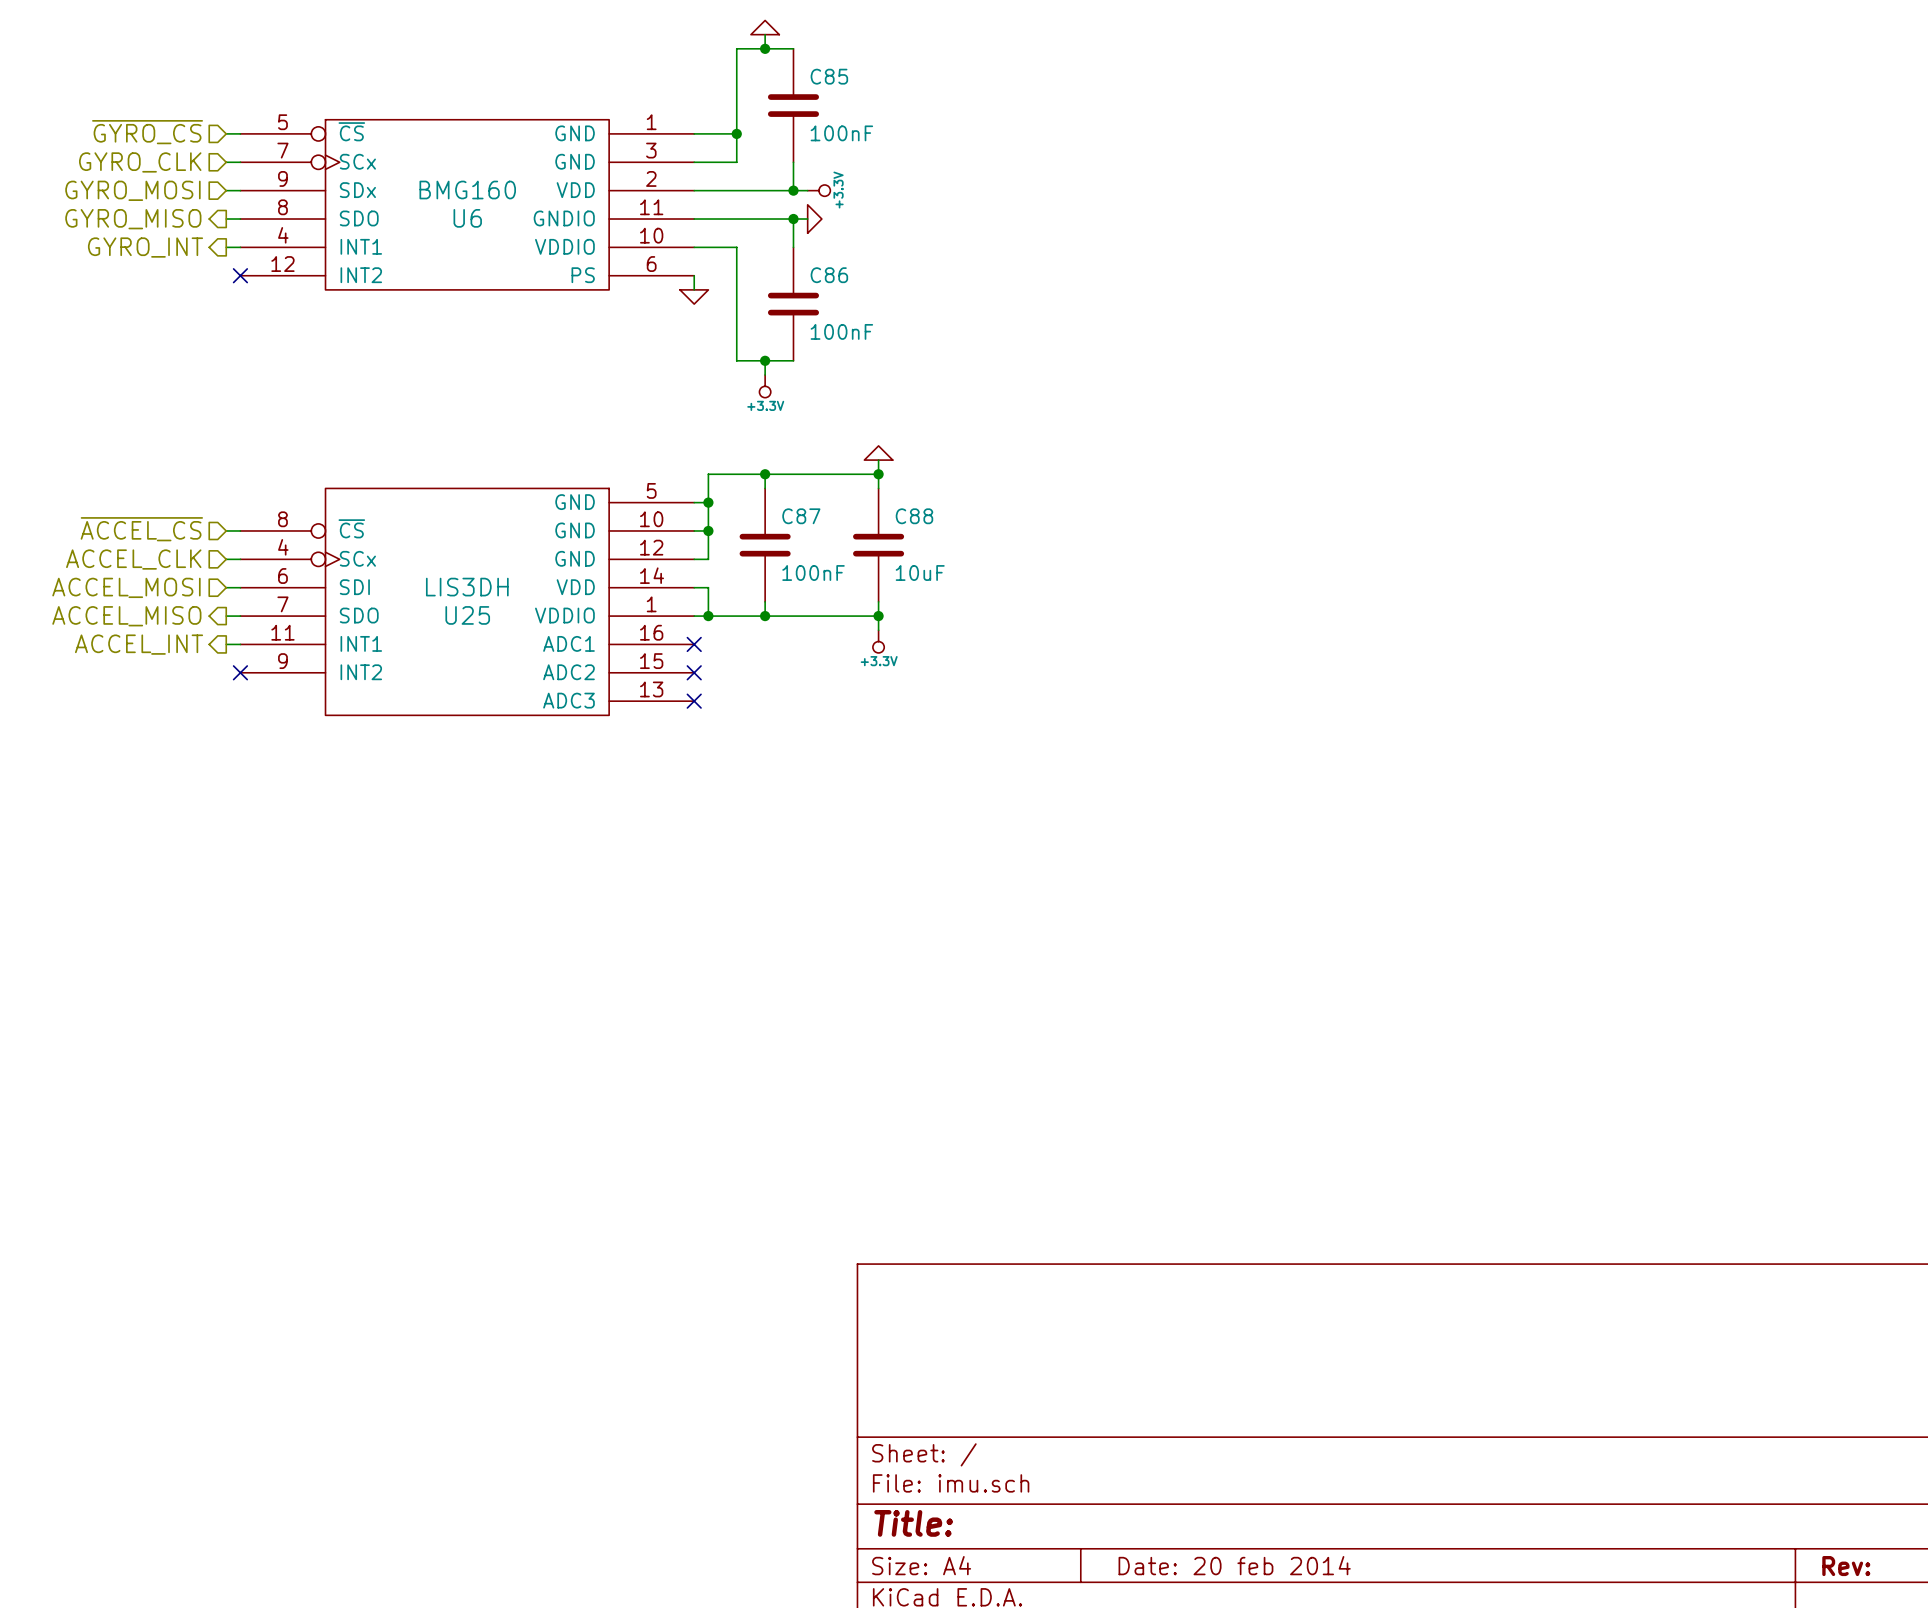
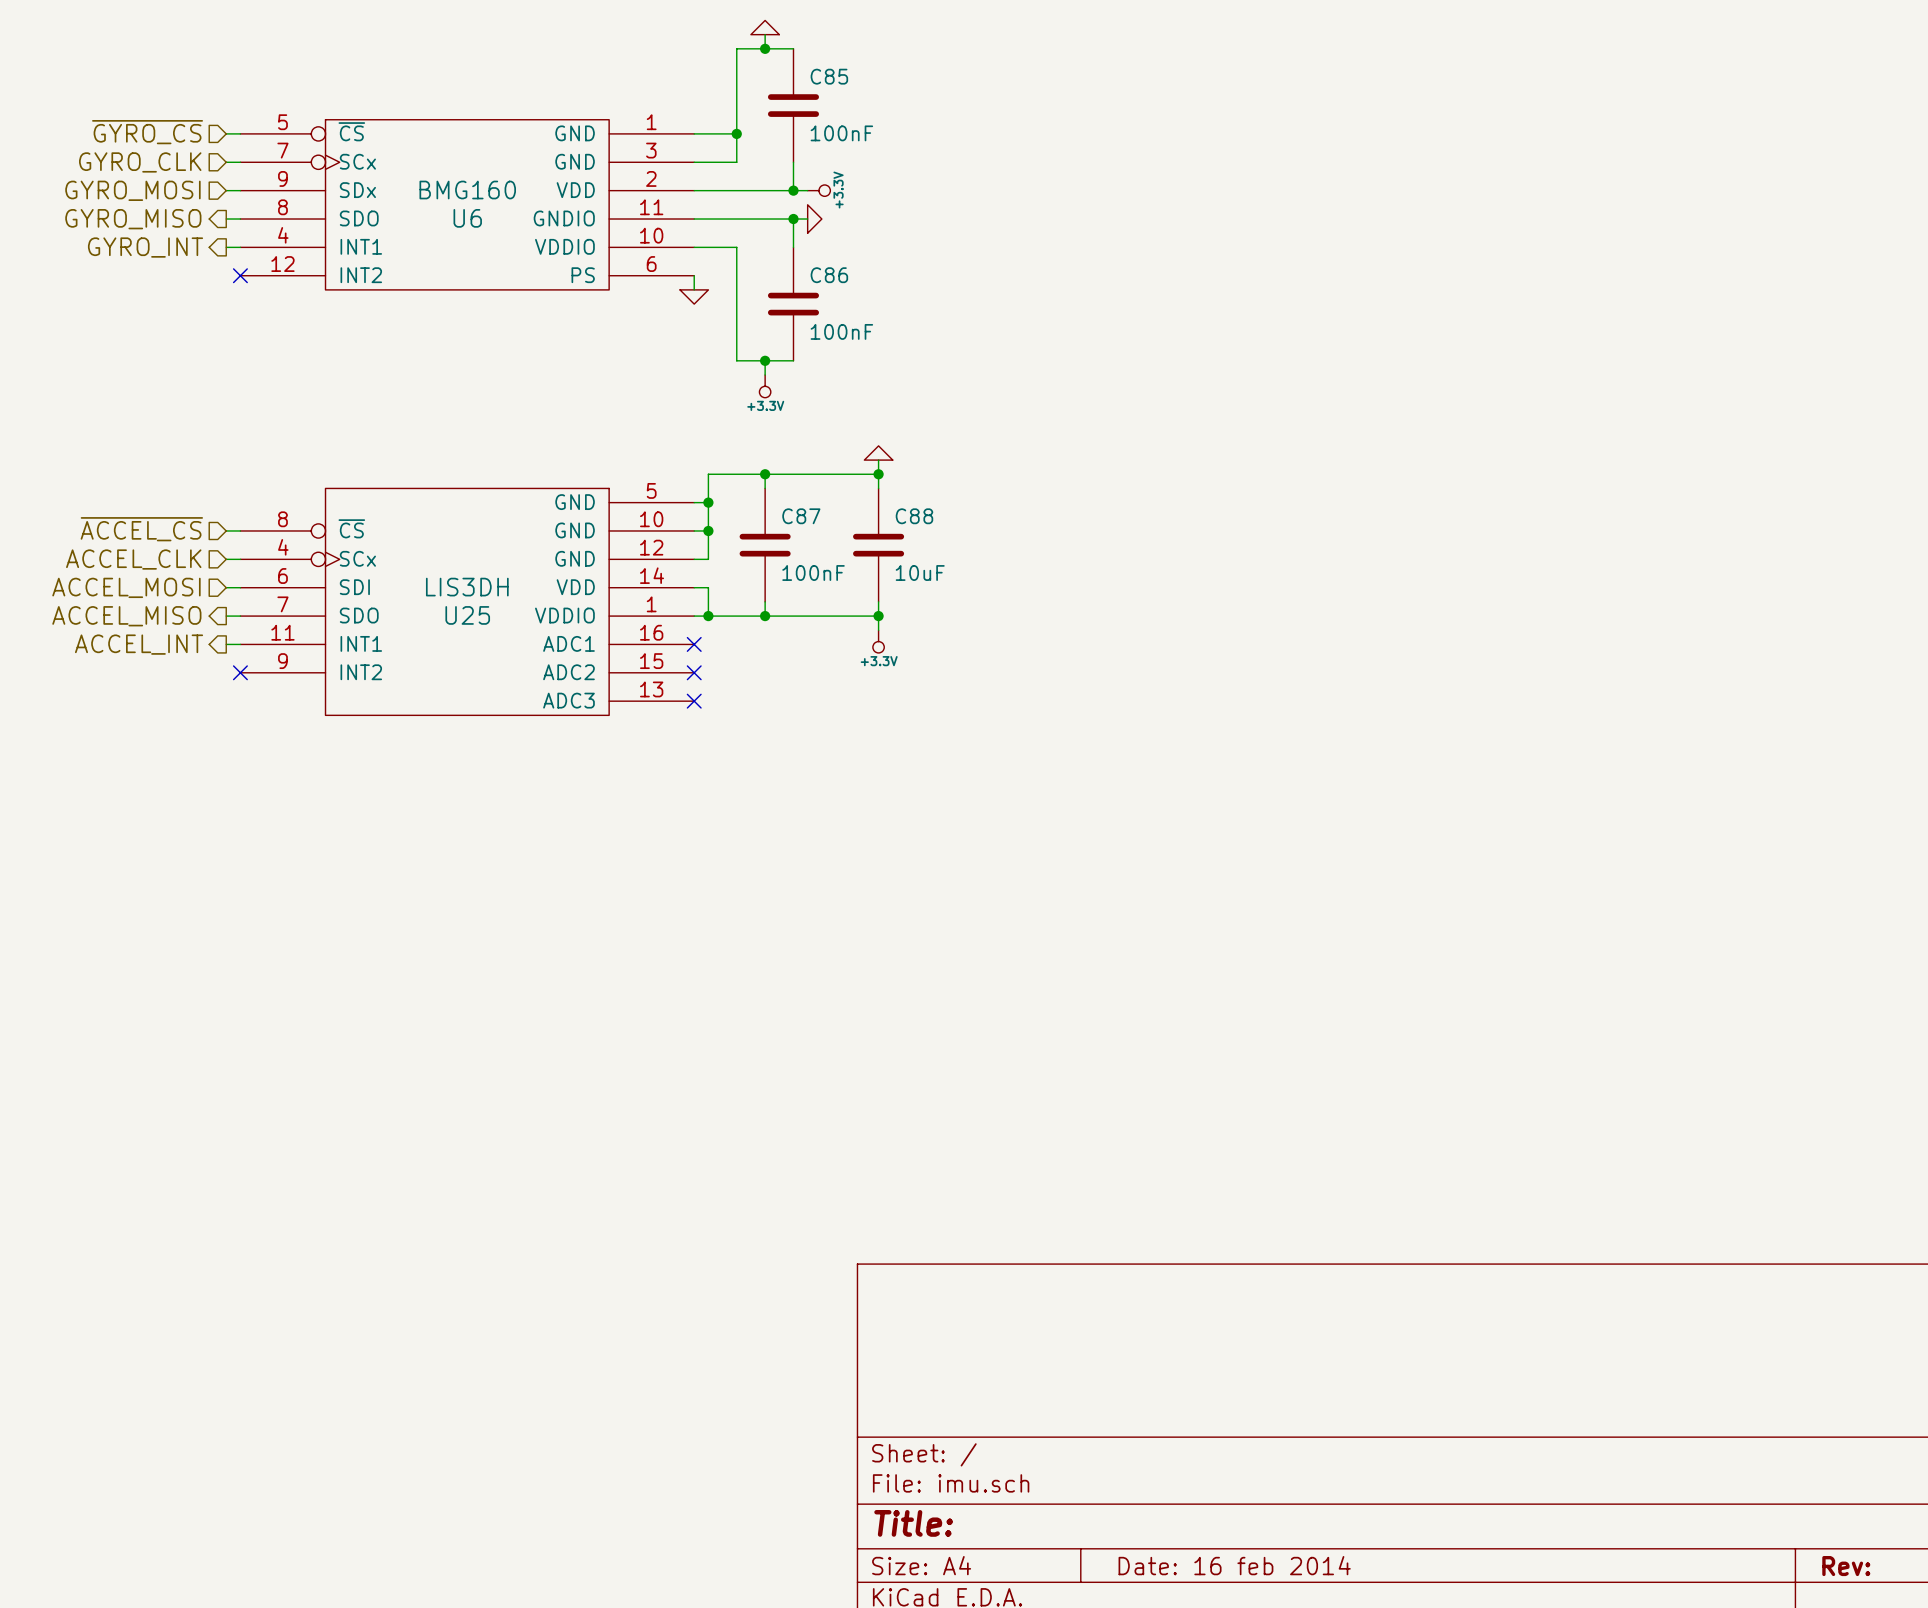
title block: Date: 20 feb 2014 (1234, 1565) -> Date: 16 feb 2014 (1234, 1565)

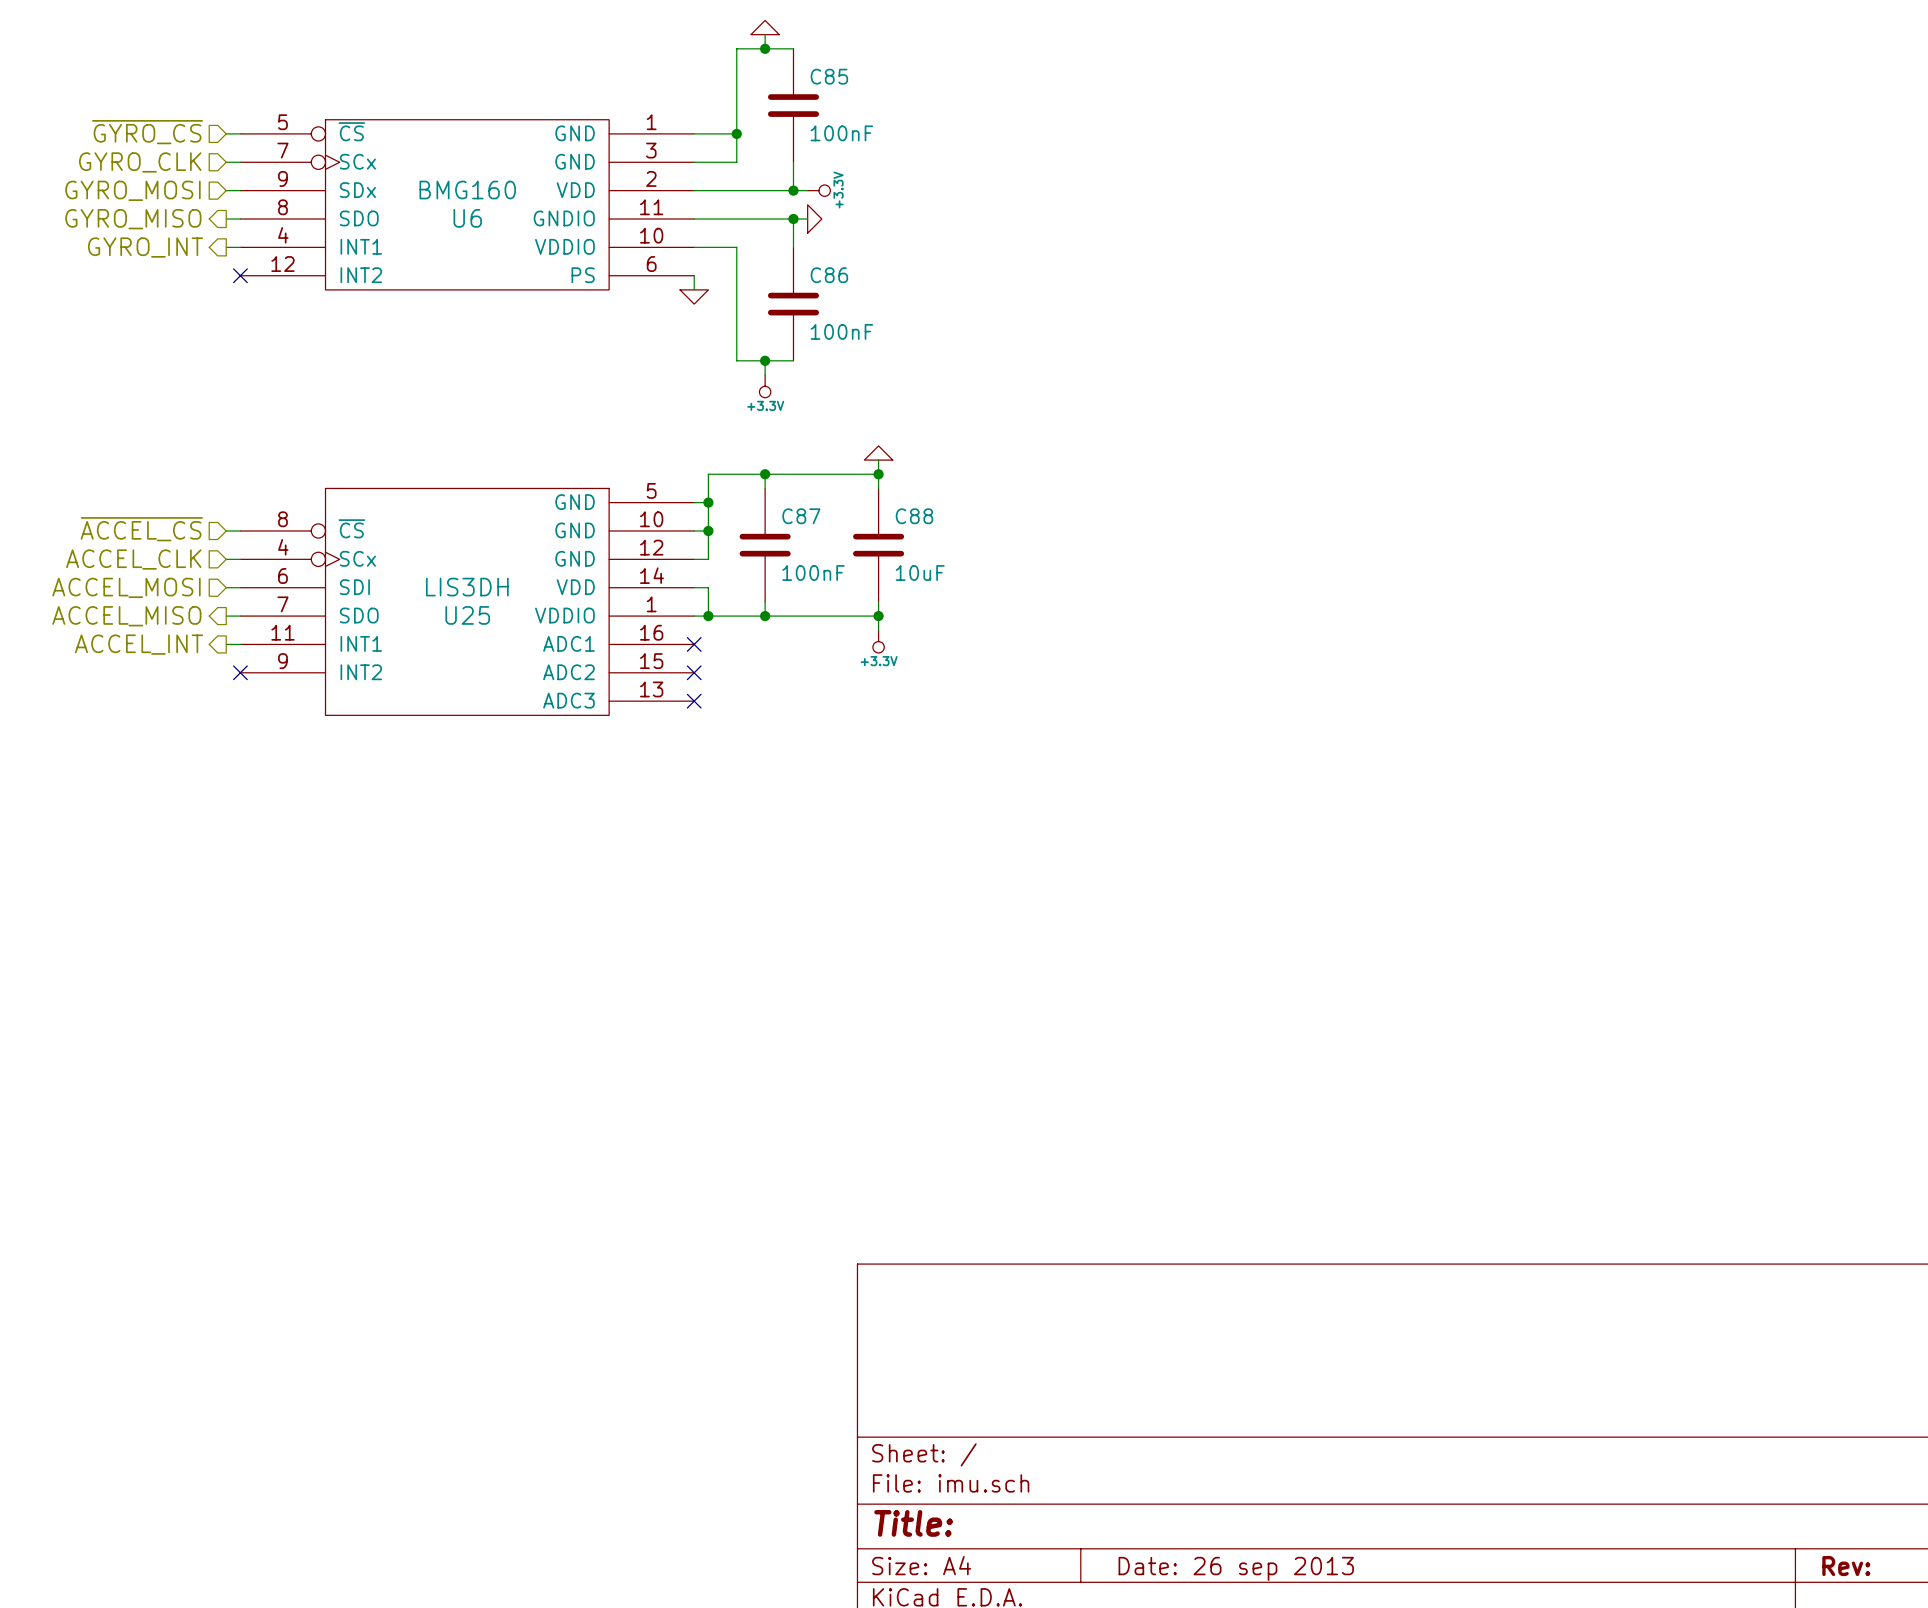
title block: Date: 16 feb 2014 (1234, 1565) -> Date: 26 sep 2013 (1236, 1568)

